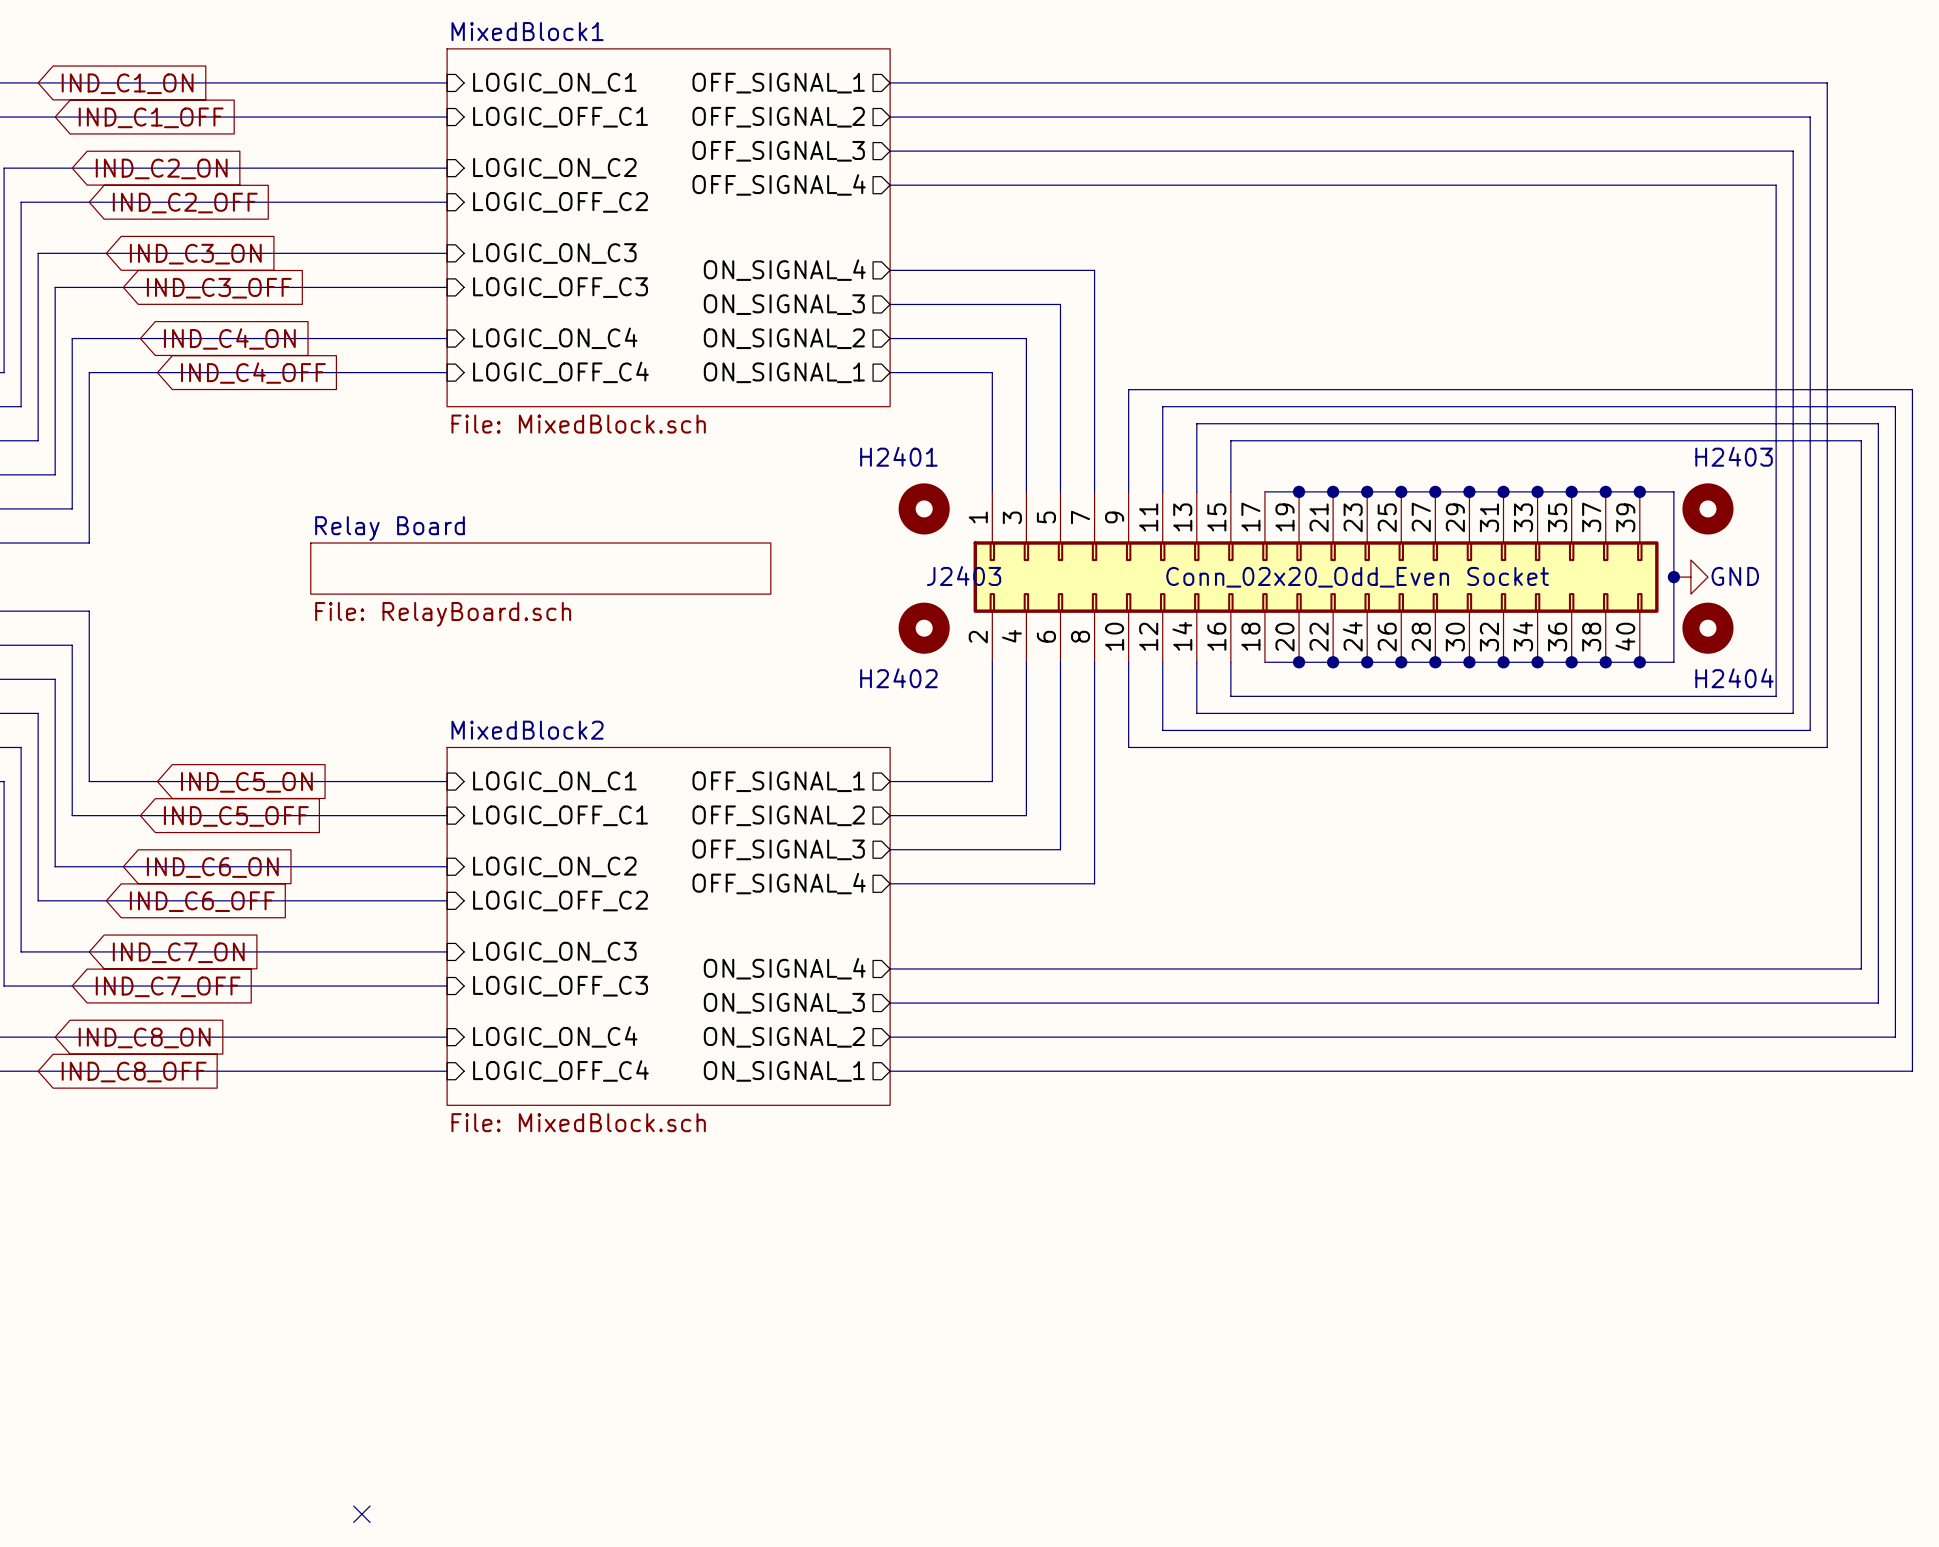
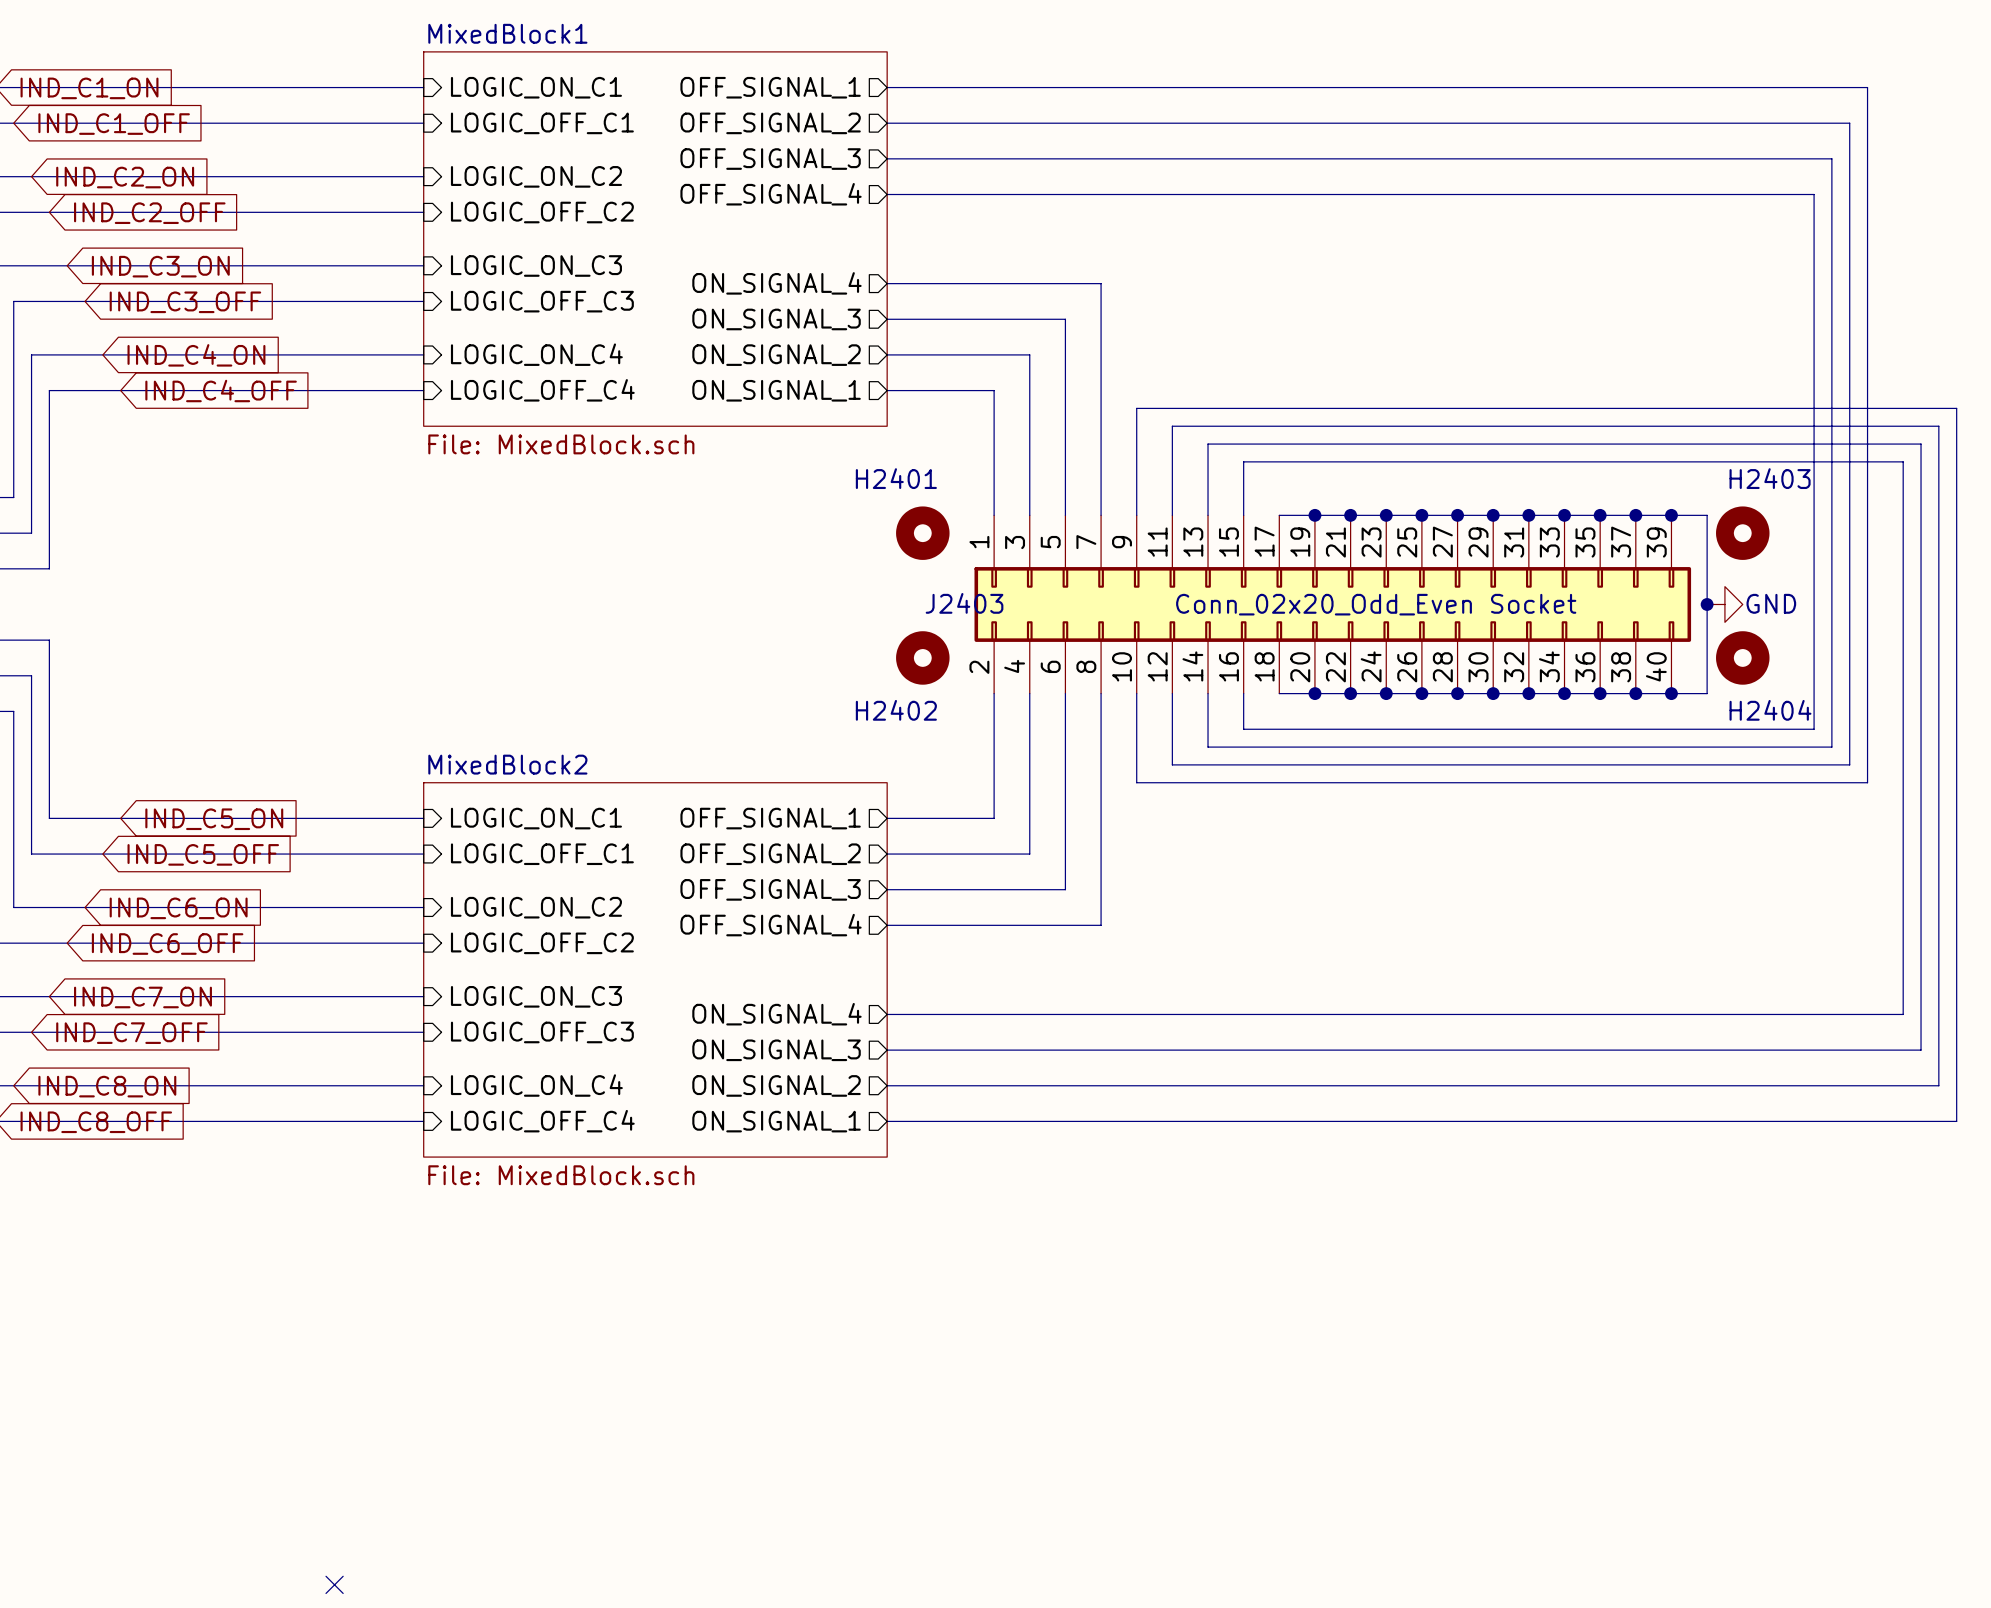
sheet Relay Board: File: RelayBoard.sch (540, 568) -> none

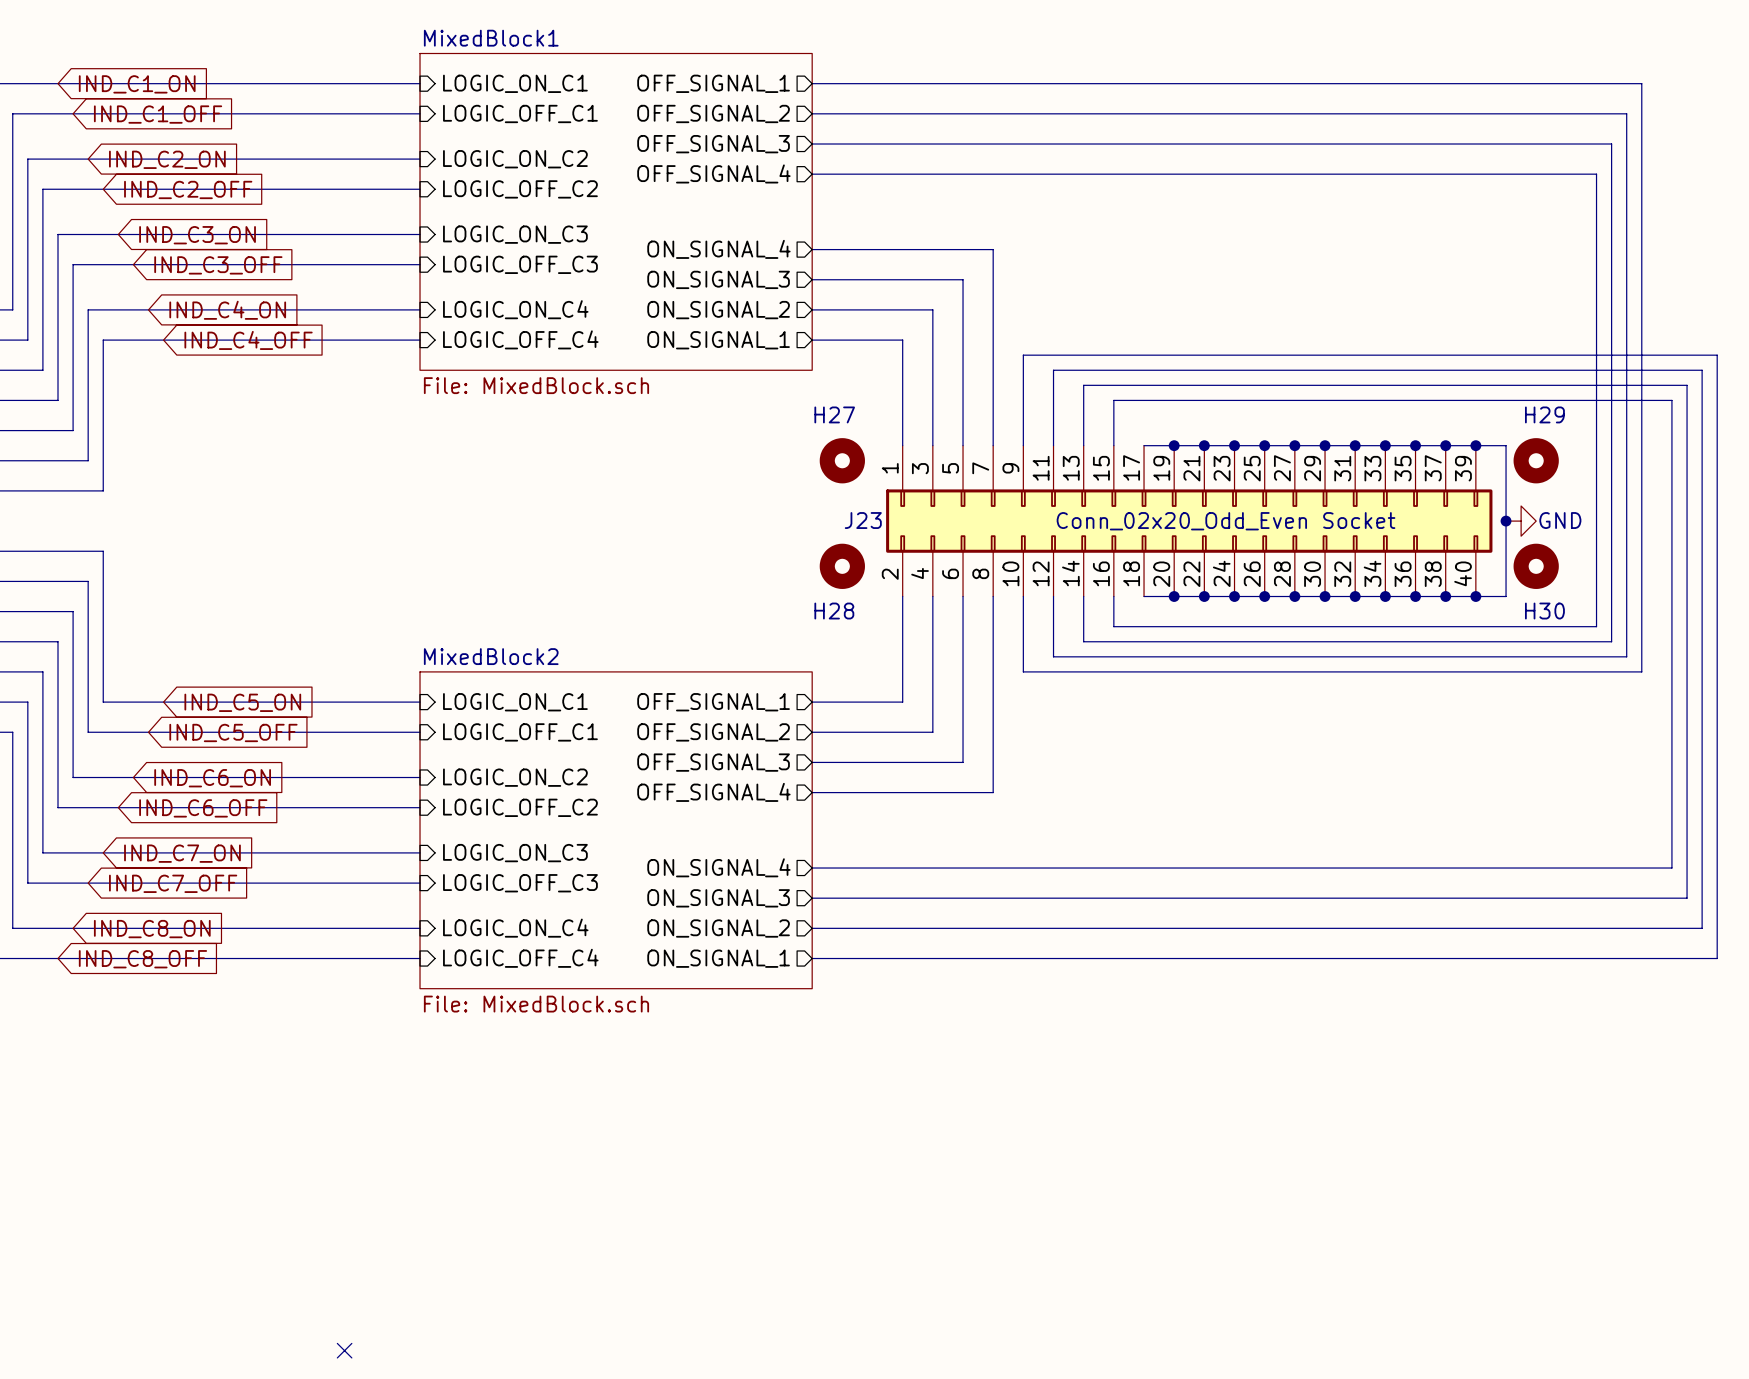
H2401 name: H2401 (896, 478) -> H27 (834, 414)
H2403 name: H2403 (1770, 478) -> H29 (1544, 414)
J2403 name: J2403 (964, 603) -> J23 (863, 520)
H2402 name: H2402 (896, 710) -> H28 (834, 611)
H2404 name: H2404 (1770, 710) -> H30 (1544, 611)

